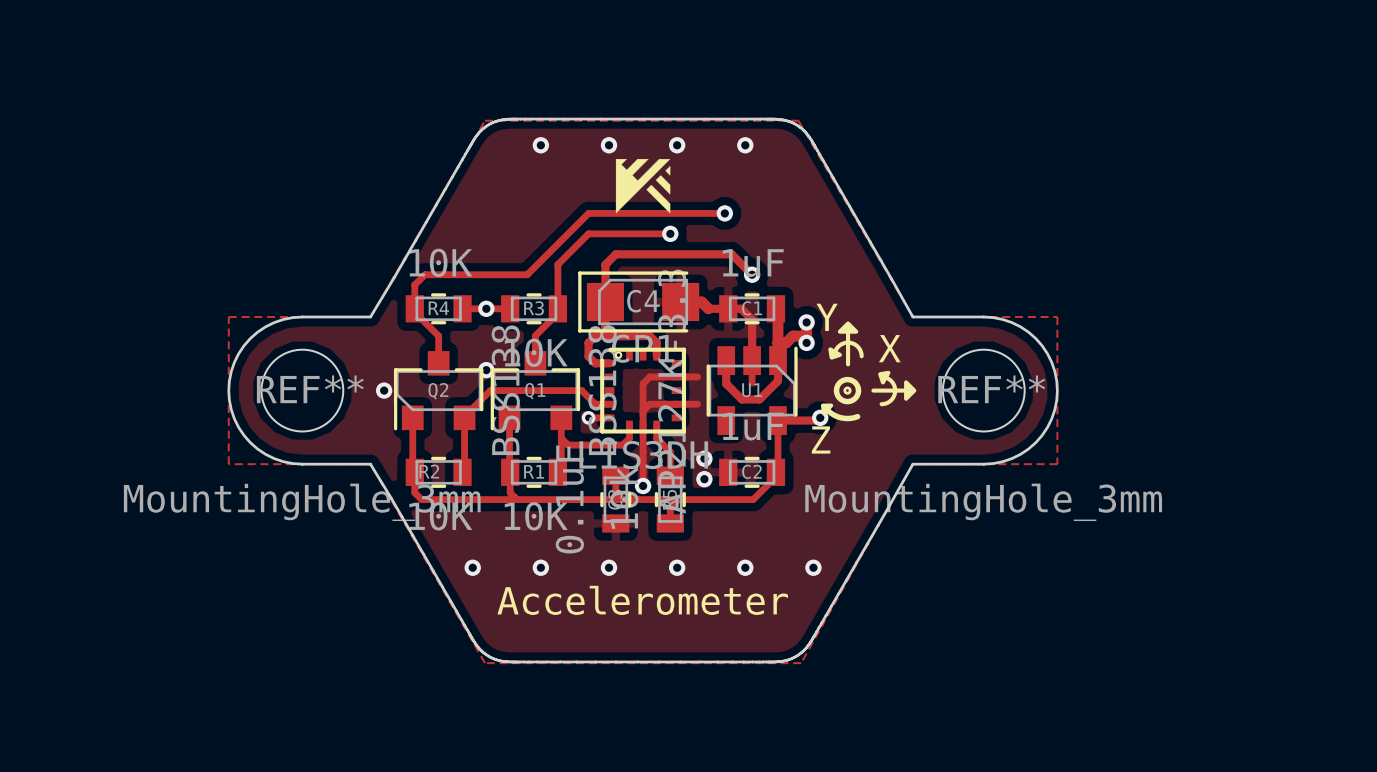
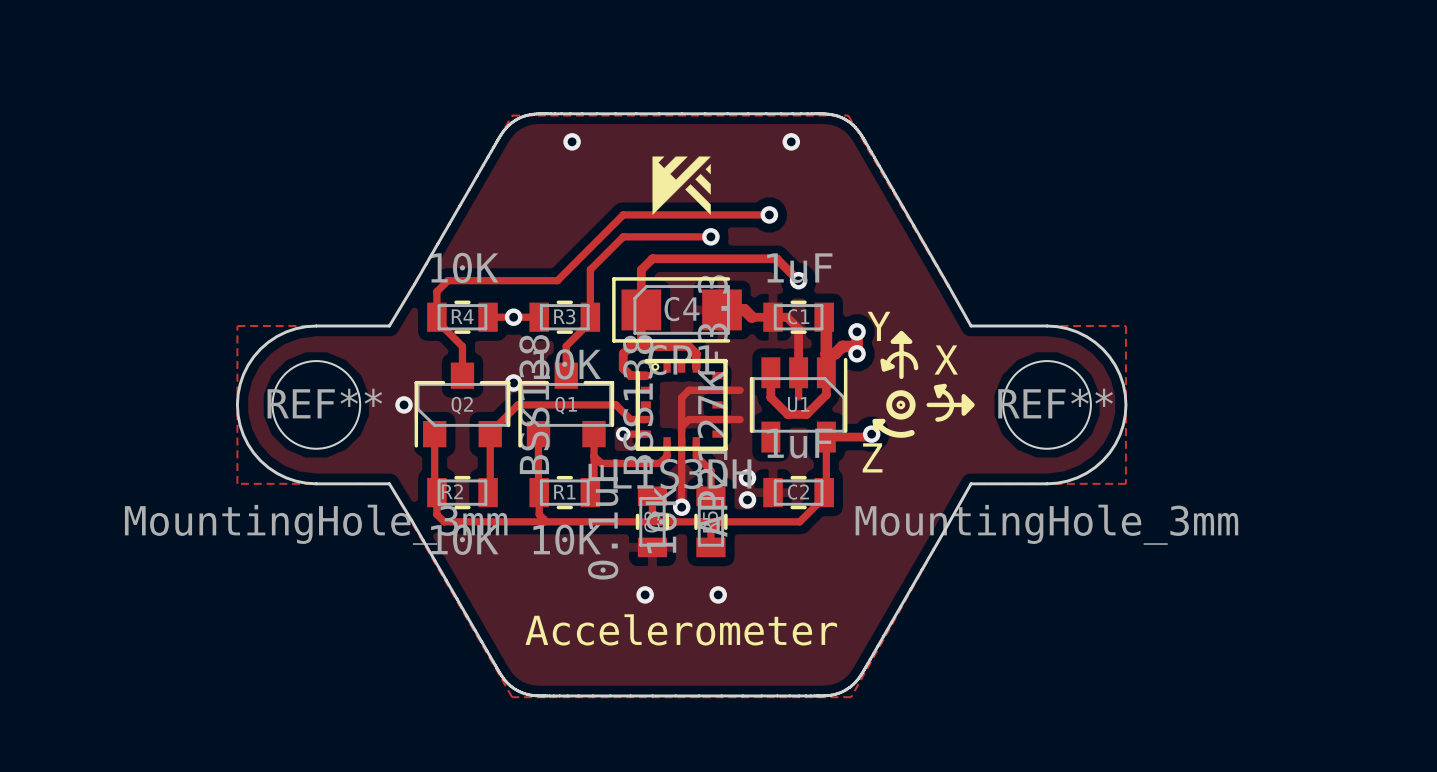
via: (609, 145) -> none
via: (677, 145) -> none
via: (472, 567) -> none
via: (540, 567) -> none
via: (745, 567) -> none
via: (813, 567) -> none

